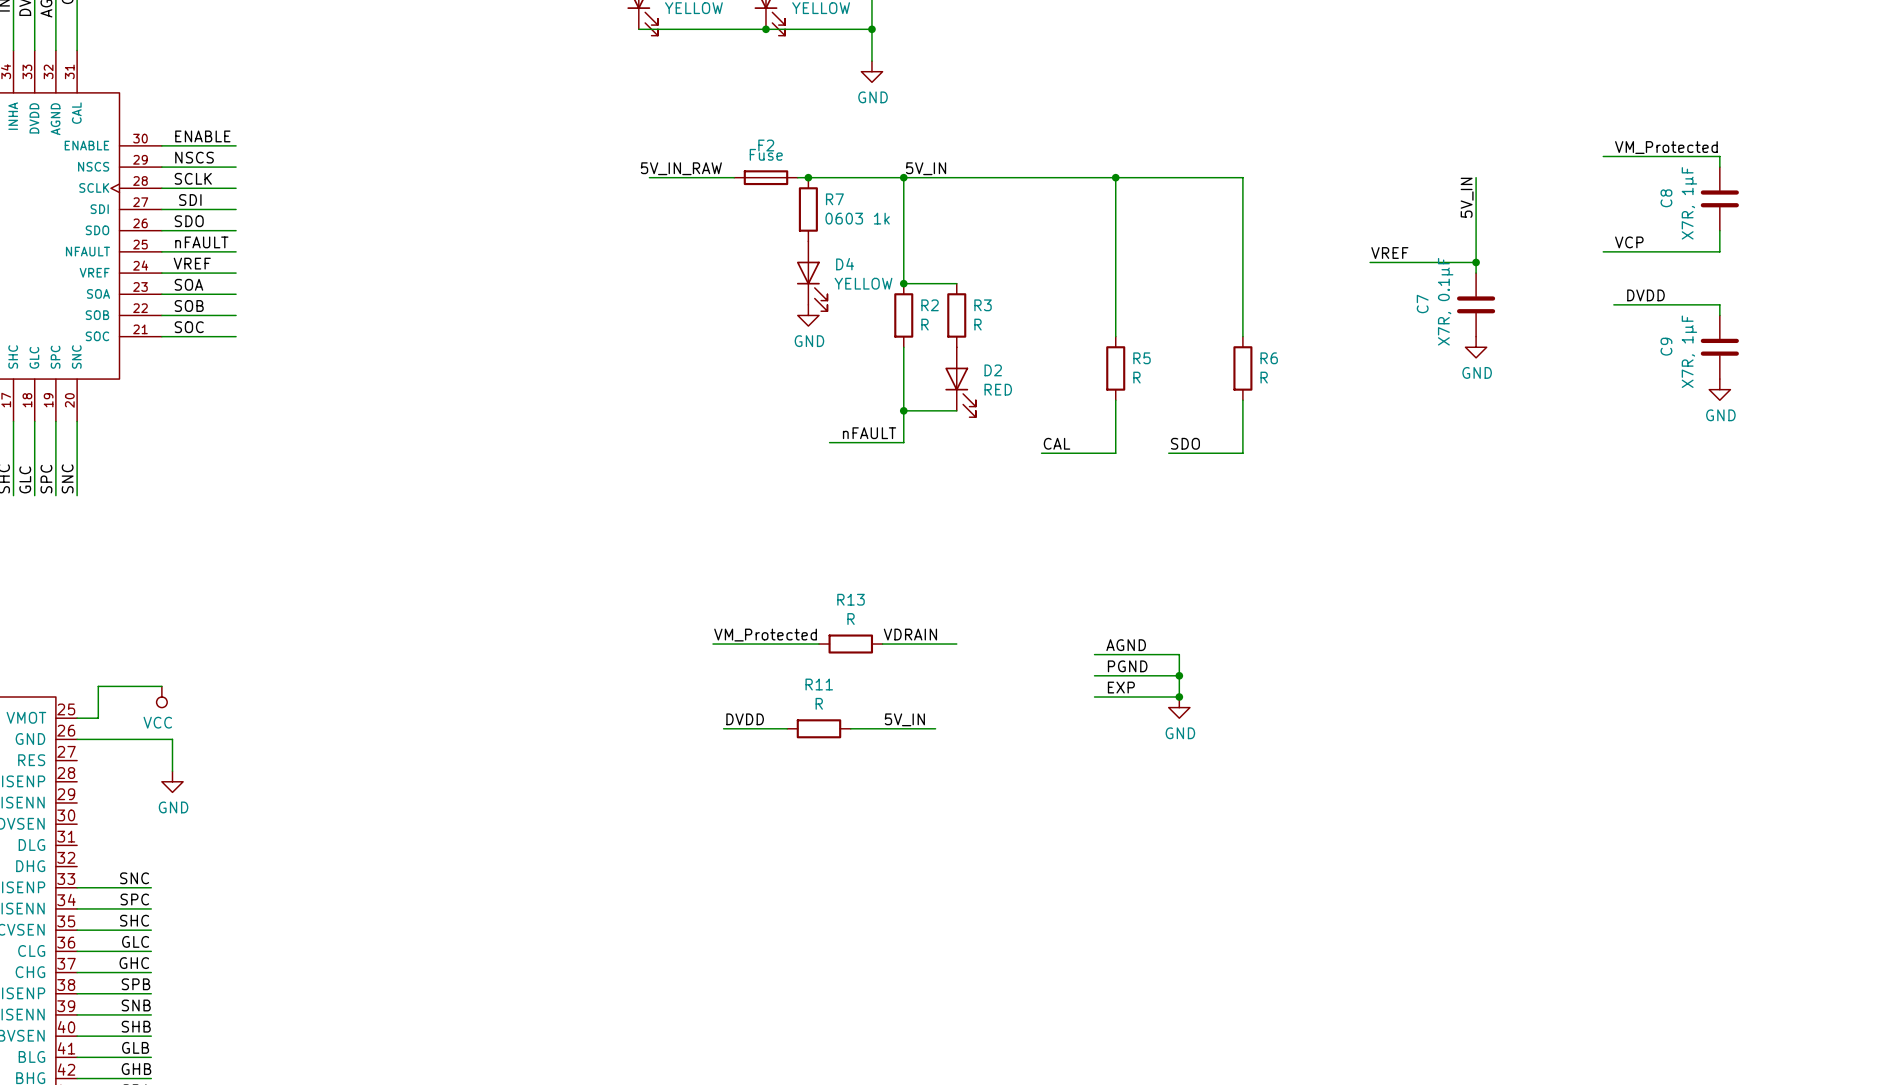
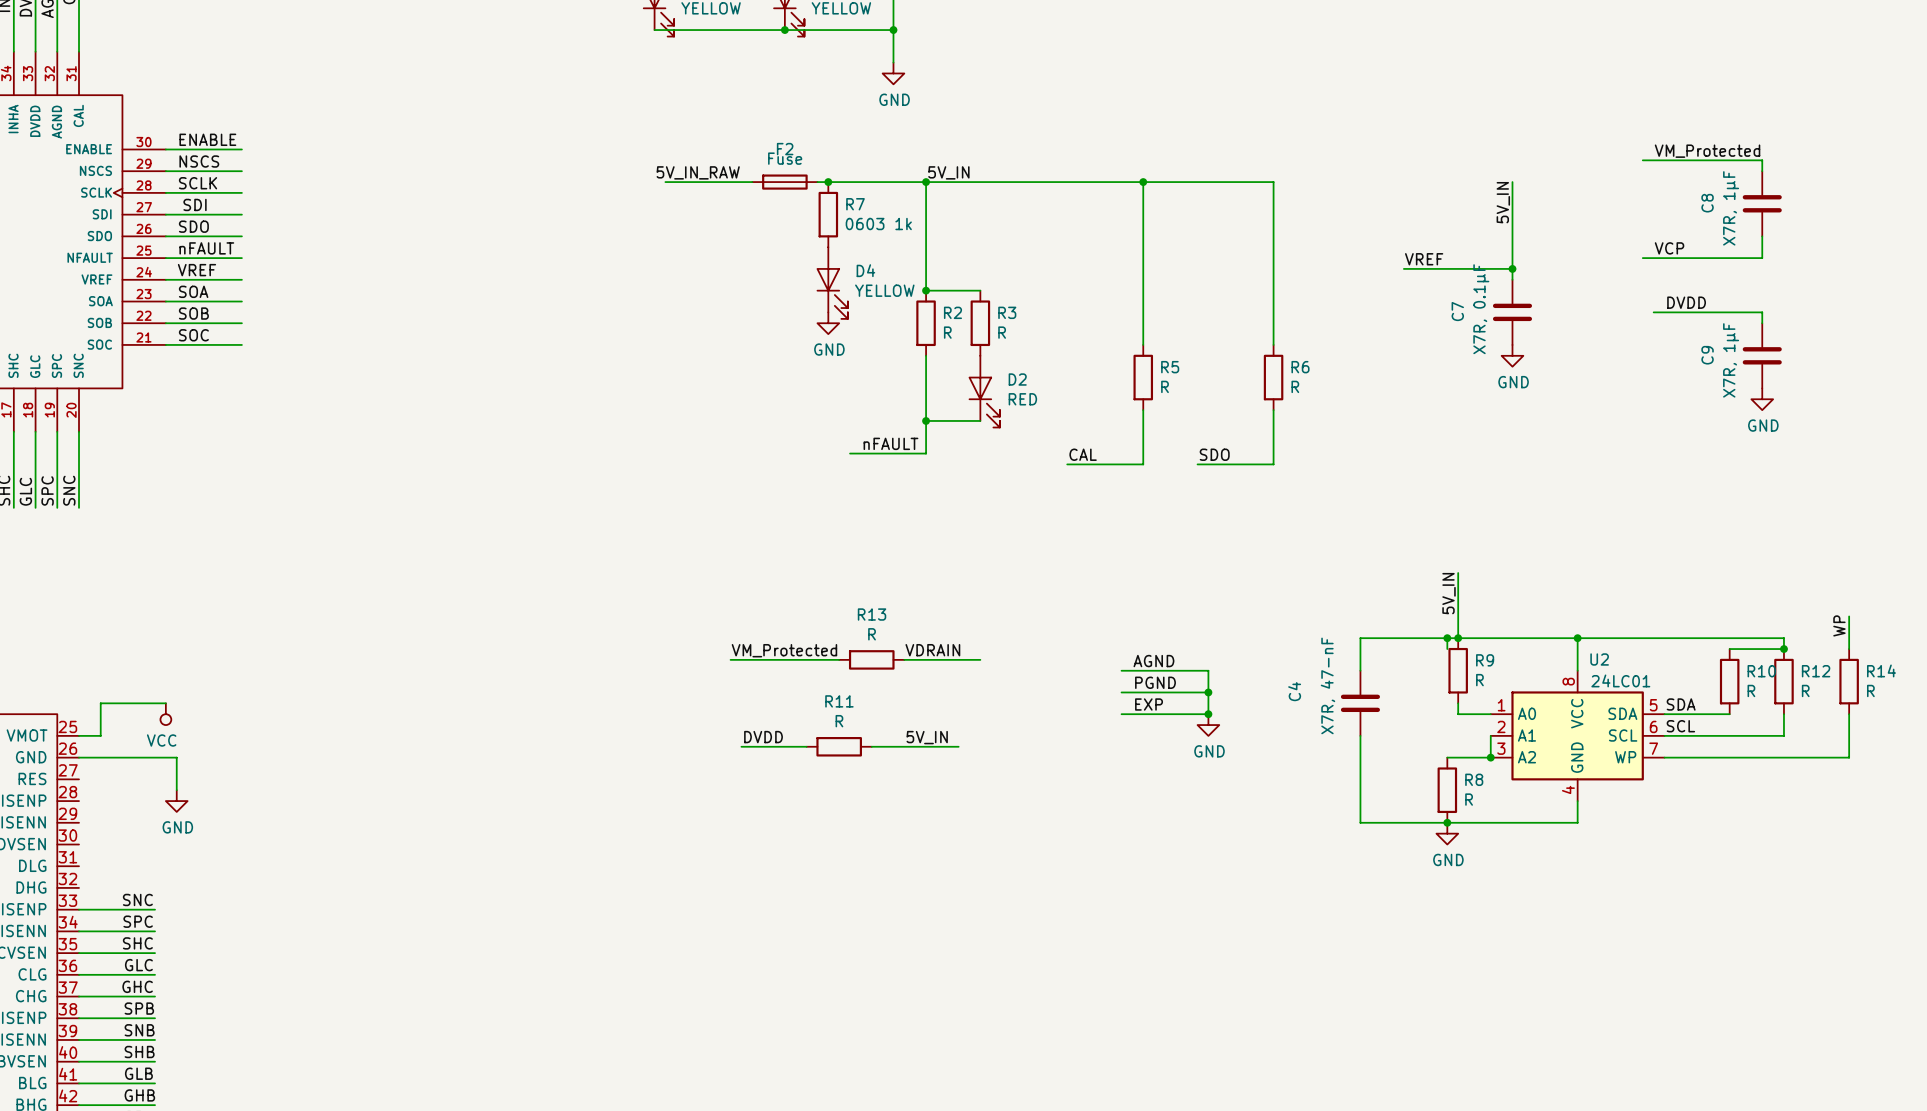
wire: none -> (1458, 573) (1458, 638)
label: none -> 5V_IN (1449, 593)
wire: none -> (1849, 616) (1849, 649)
label: none -> WP (1839, 625)
wire: none -> (1447, 638) (1447, 649)
junction: none -> (1447, 638)
junction: none -> (1458, 638)
wire: none -> (1577, 638) (1577, 670)
junction: none -> (1577, 638)
wire: none -> (1729, 649) (1783, 649) (1783, 638) (1360, 638) (1360, 670)
junction: none -> (1783, 649)
R9: none -> R (1458, 670)
R10: none -> R (1729, 681)
R12: none -> R (1783, 681)
R14: none -> R (1849, 681)
C4: none -> X7R, 47-nF (1360, 703)
wire: none -> (1458, 703) (1458, 714) (1490, 714)
label: none -> SDA (1681, 704)
wire: none -> (1664, 714) (1729, 714)
wire: none -> (1783, 714) (1783, 735) (1664, 735)
wire: none -> (1849, 714) (1849, 757) (1664, 757)
label: none -> SCL (1680, 726)
wire: none -> (1360, 735) (1360, 822) (1577, 822) (1577, 801)
wire: none -> (1490, 735) (1490, 757) (1447, 757)
U2: none -> 24LC01 (1577, 735)
junction: none -> (1490, 757)
R8: none -> R (1447, 790)
junction: none -> (1447, 822)
power symbol: none -> GND (1447, 833)

